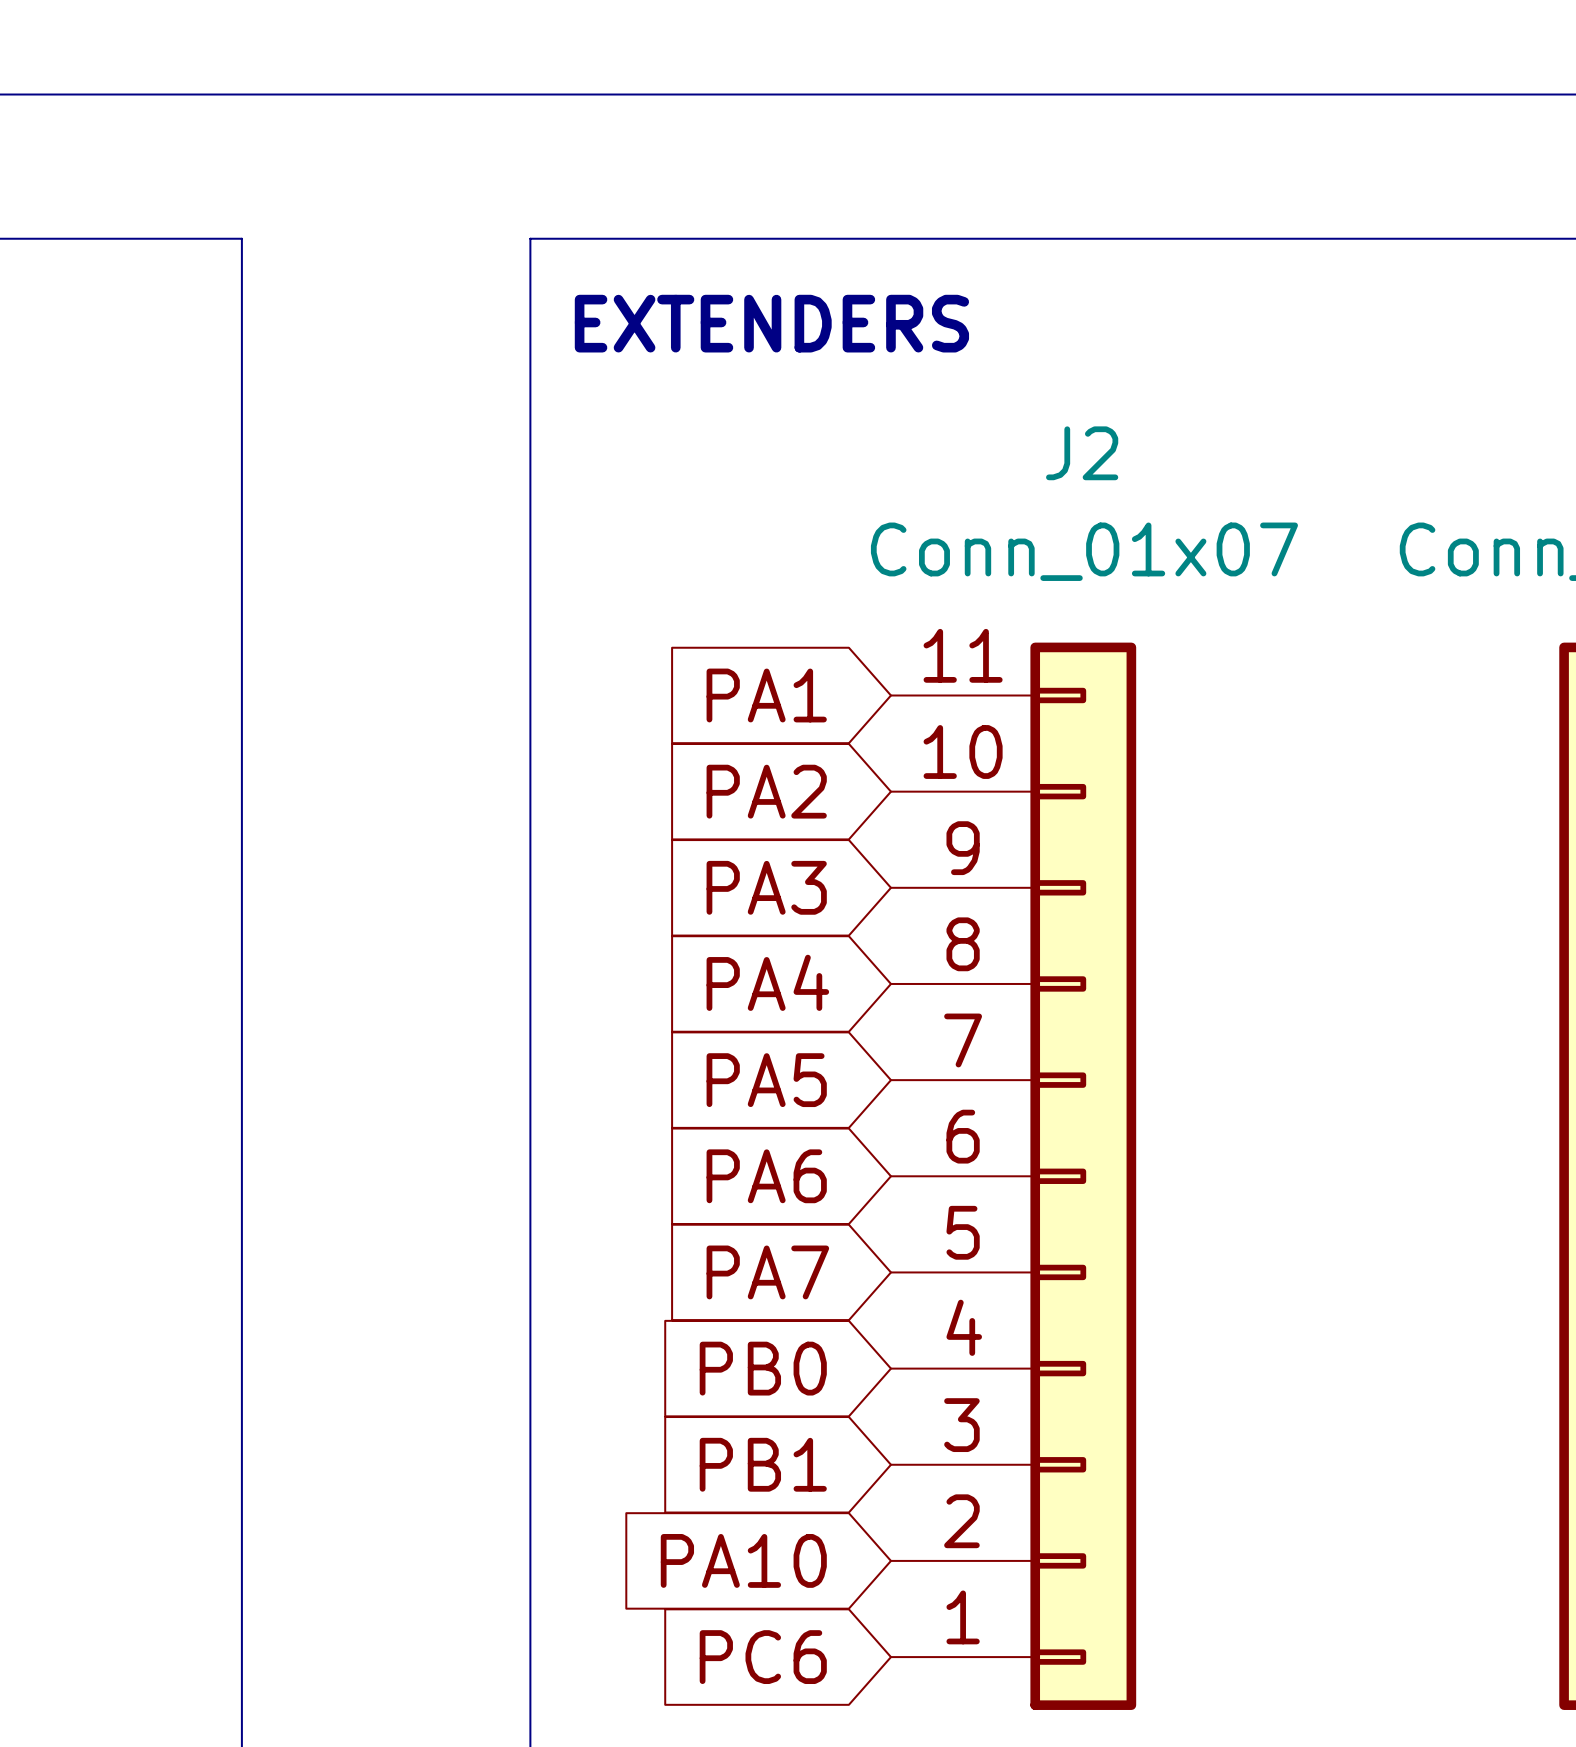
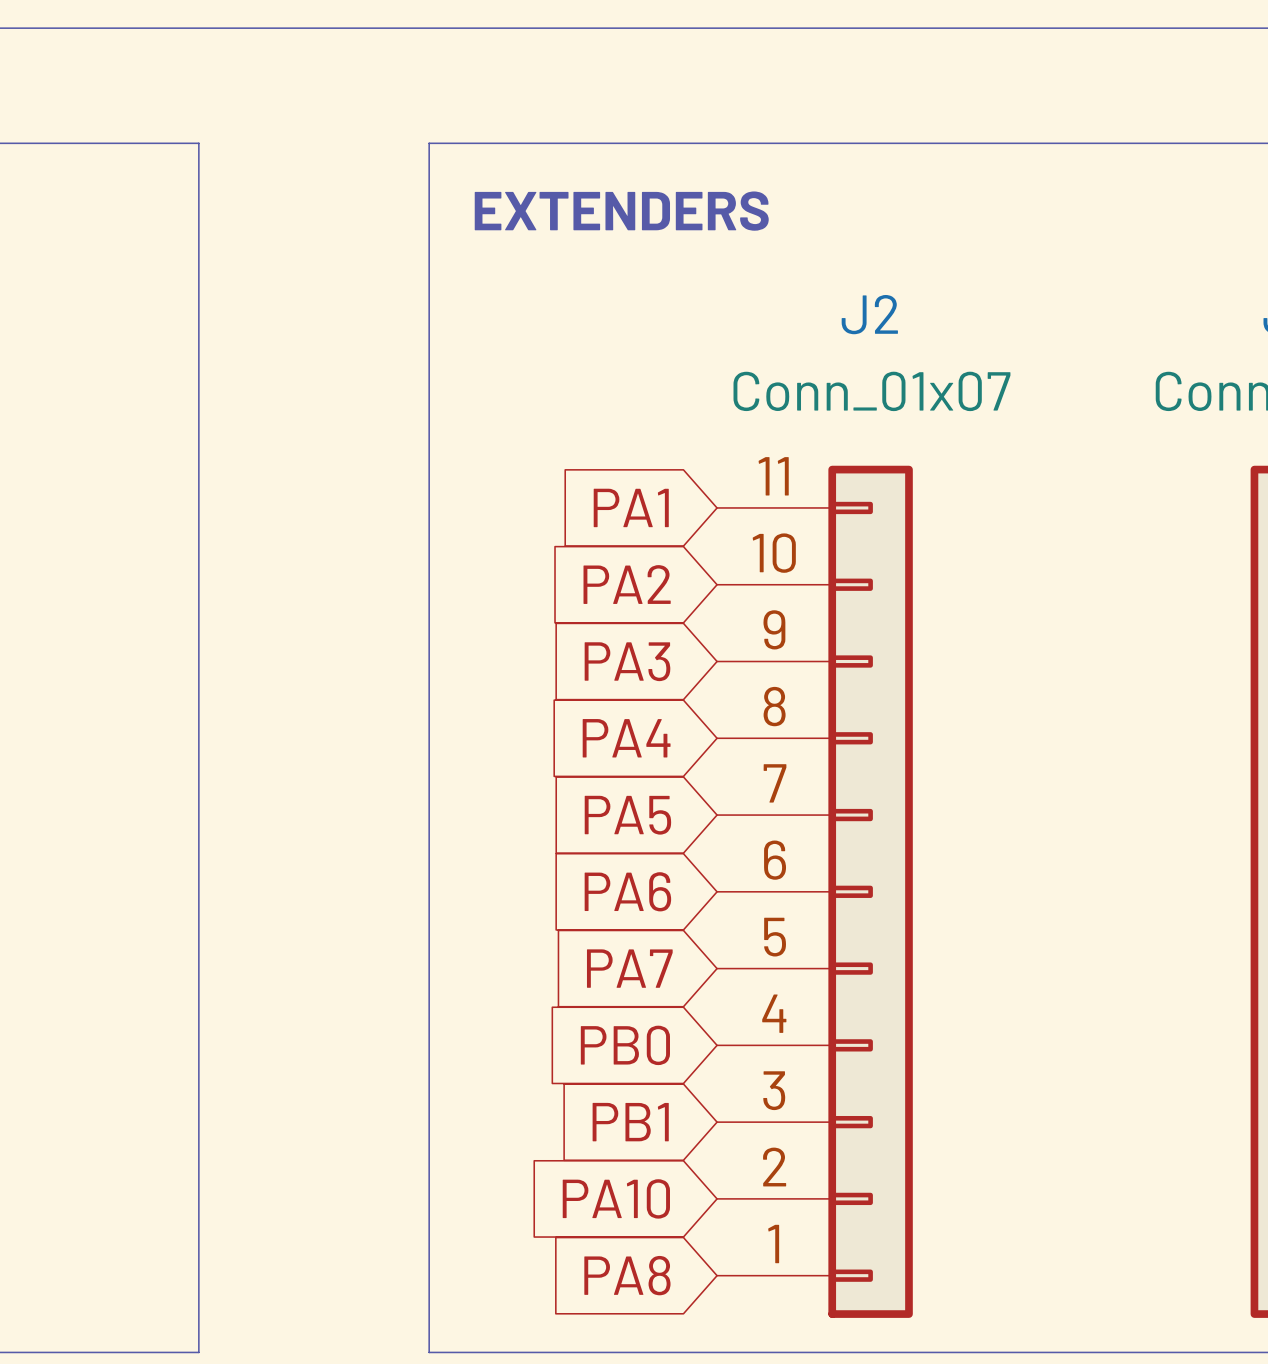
global label: PC6 (763, 1657) -> PA8 (627, 1275)

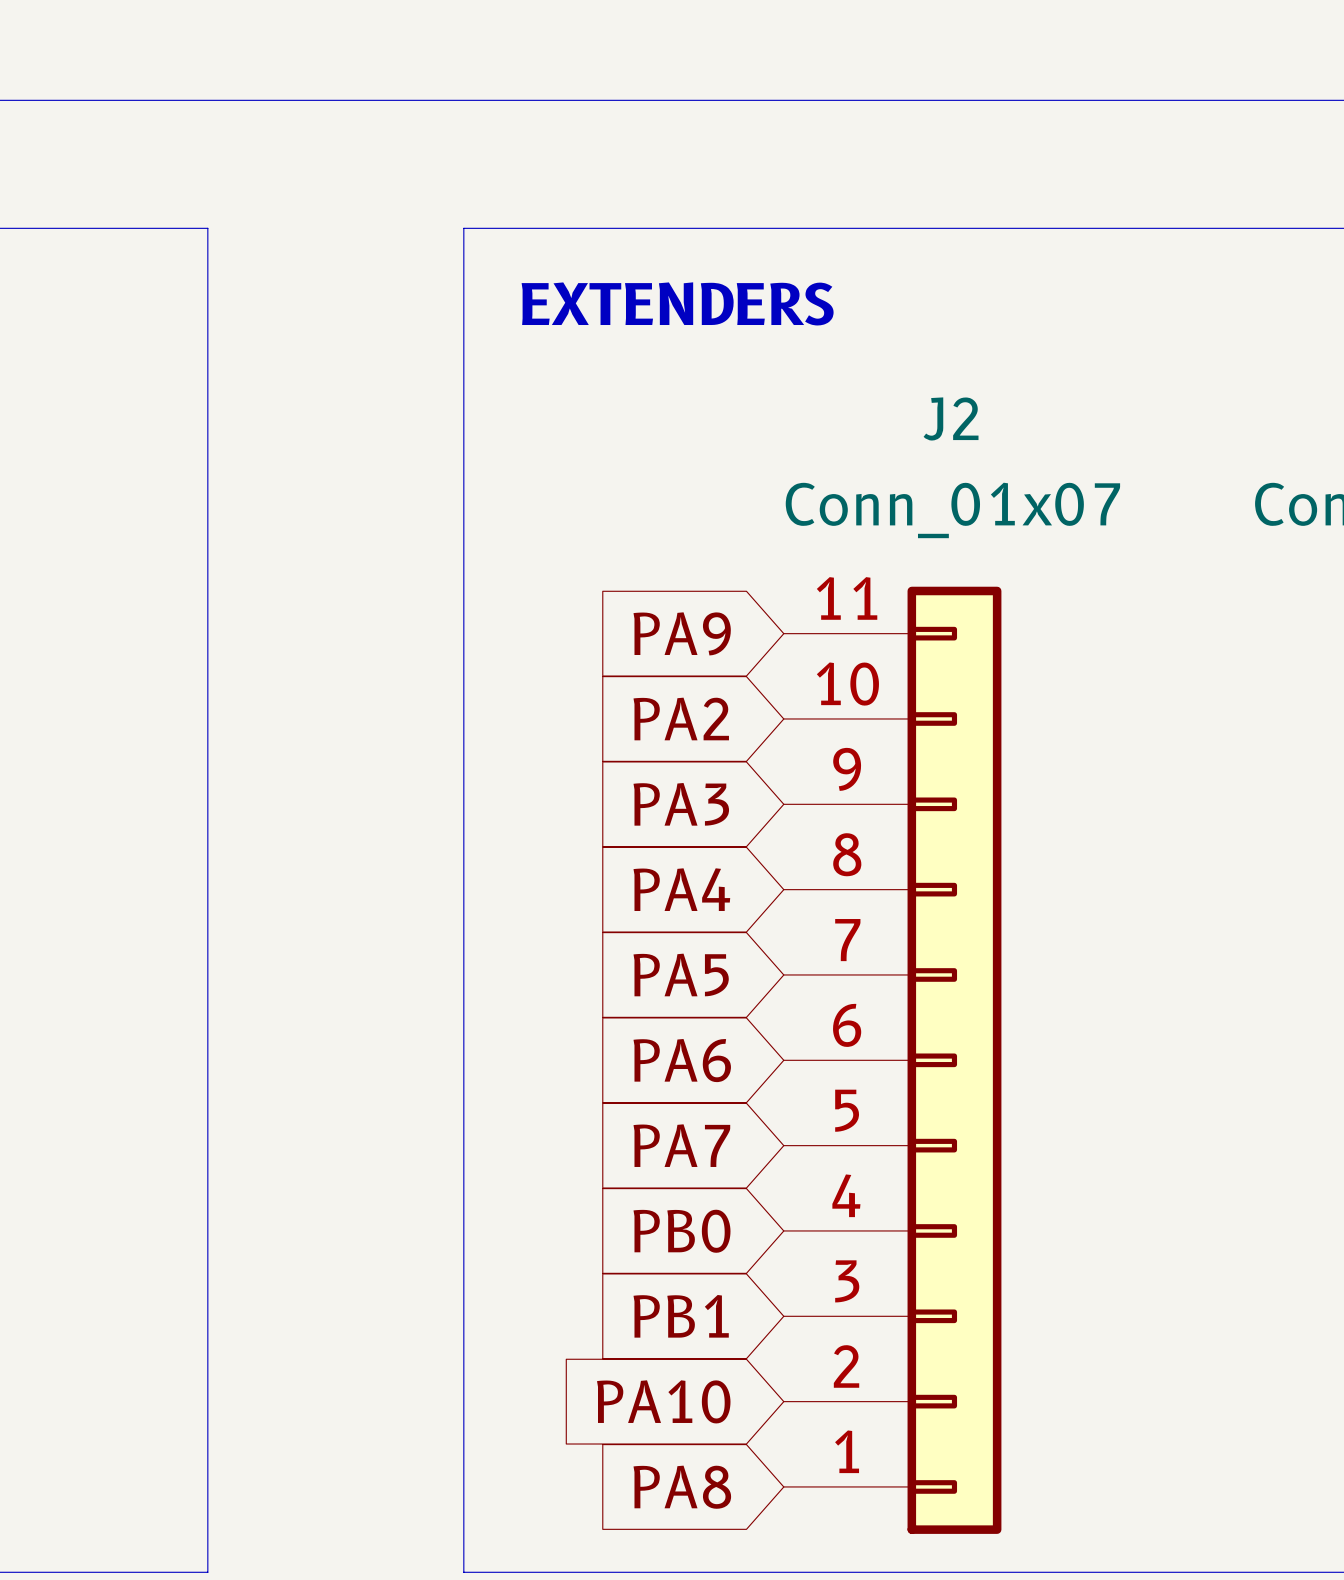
global label: PA1 (631, 507) -> PA9 (682, 633)

